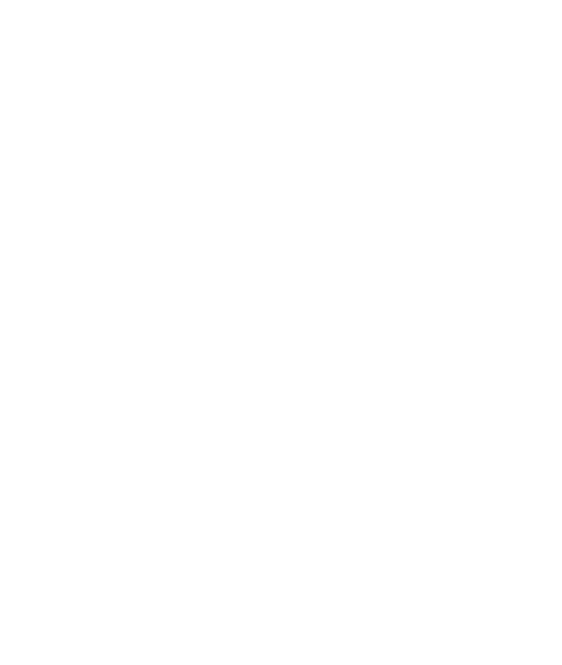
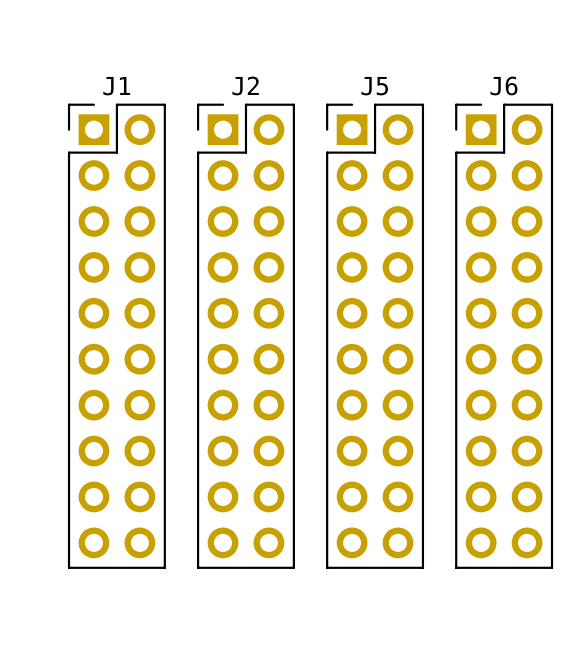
J1: none -> (116, 336)
J2: none -> (245, 336)
J5: none -> (375, 336)
J6: none -> (504, 336)

